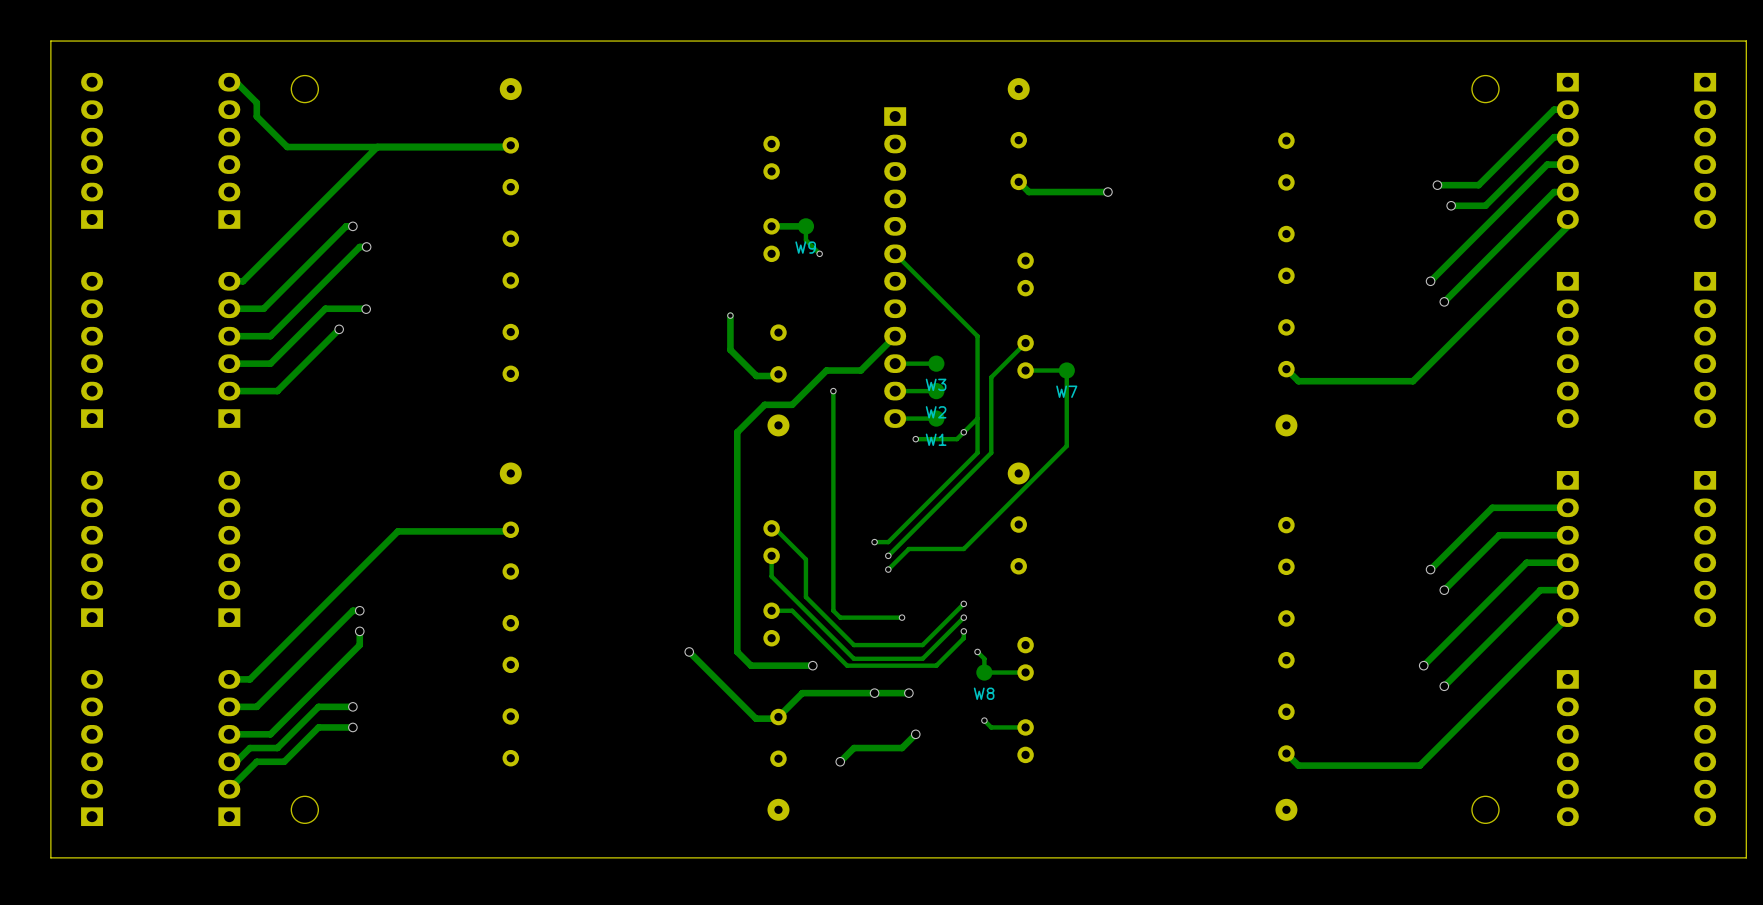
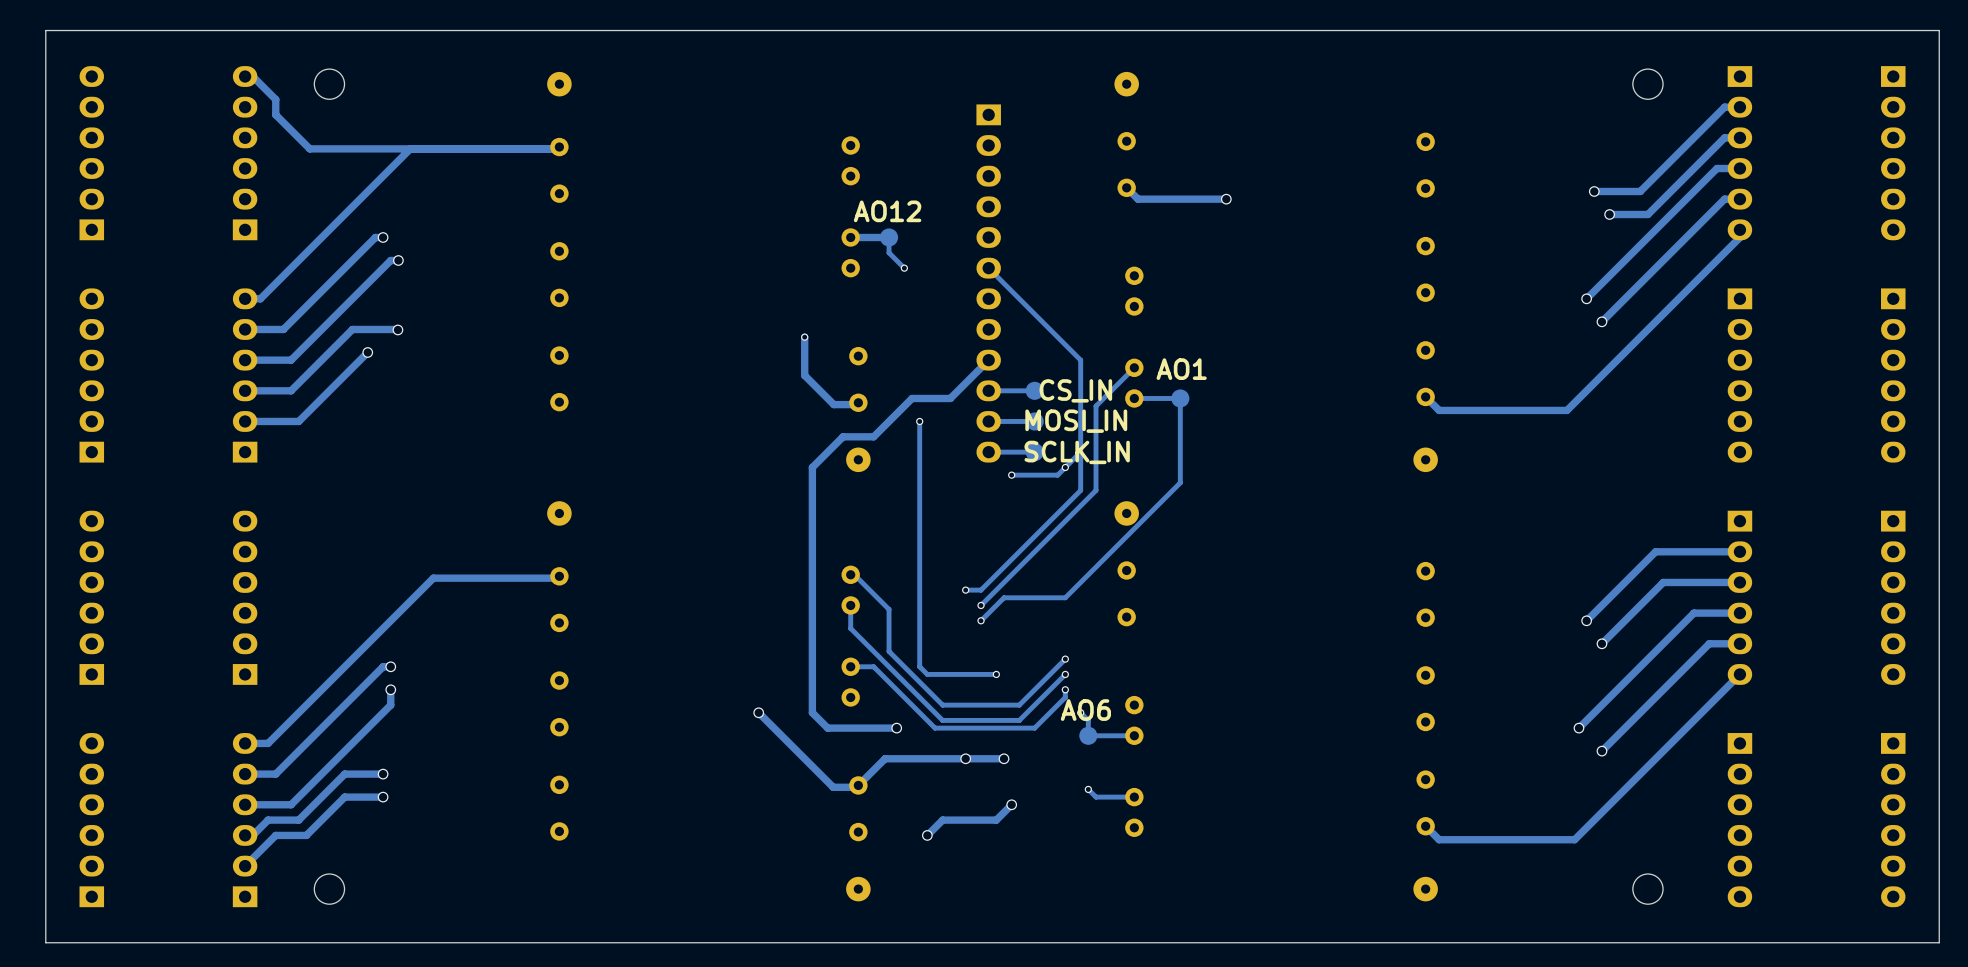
text: none -> AO12 (887, 211)
W9 name: W9 (805, 247) -> none
text: none -> AO1 (1181, 369)
text: none -> CS_IN (1075, 390)
W3 name: W3 (936, 384) -> none
text: none -> MOSI_IN (1076, 421)
W7 name: W7 (1066, 391) -> none
W2 name: W2 (936, 412) -> none
text: none -> SCLK_IN (1077, 452)
W1 name: W1 (936, 439) -> none
text: none -> AO6 (1085, 710)
W8 name: W8 (984, 693) -> none

